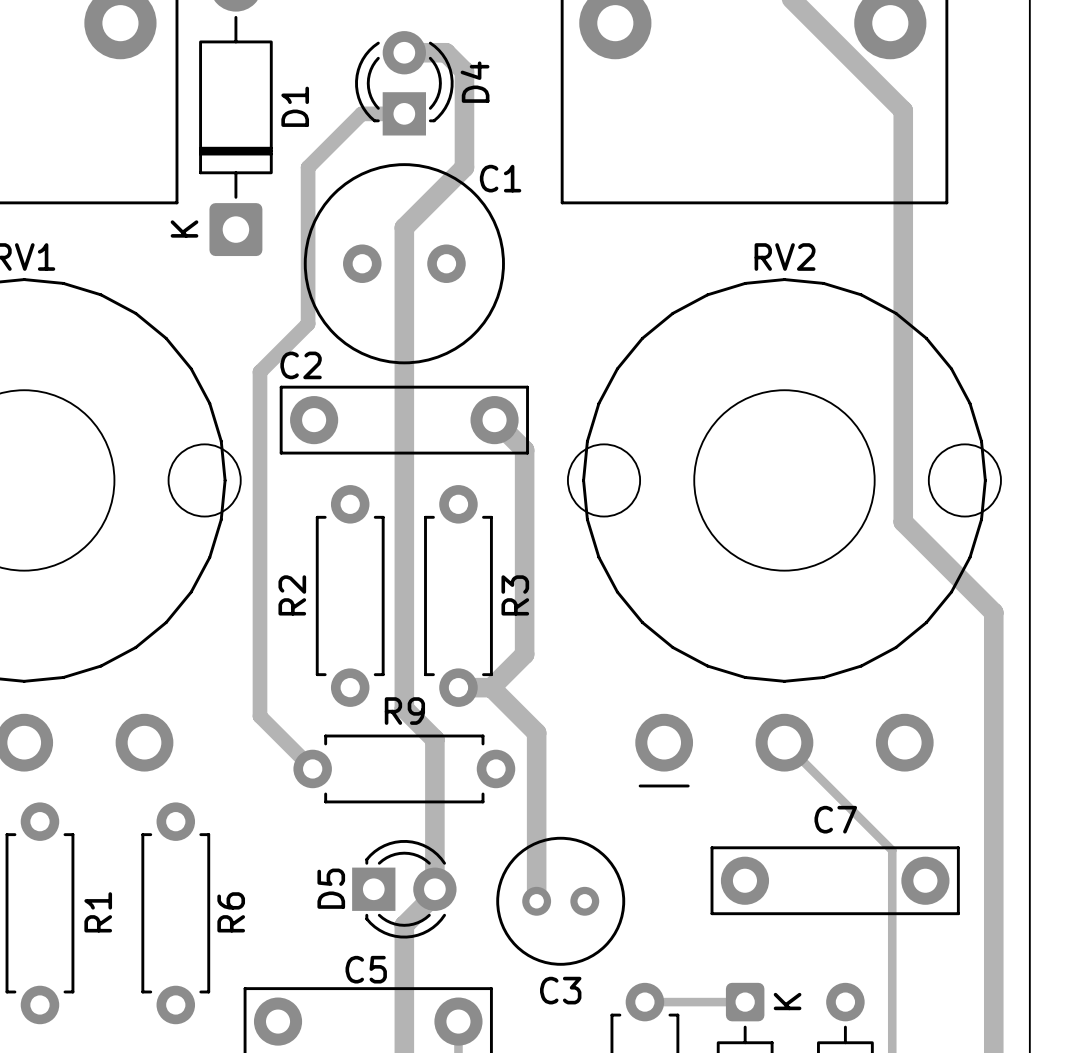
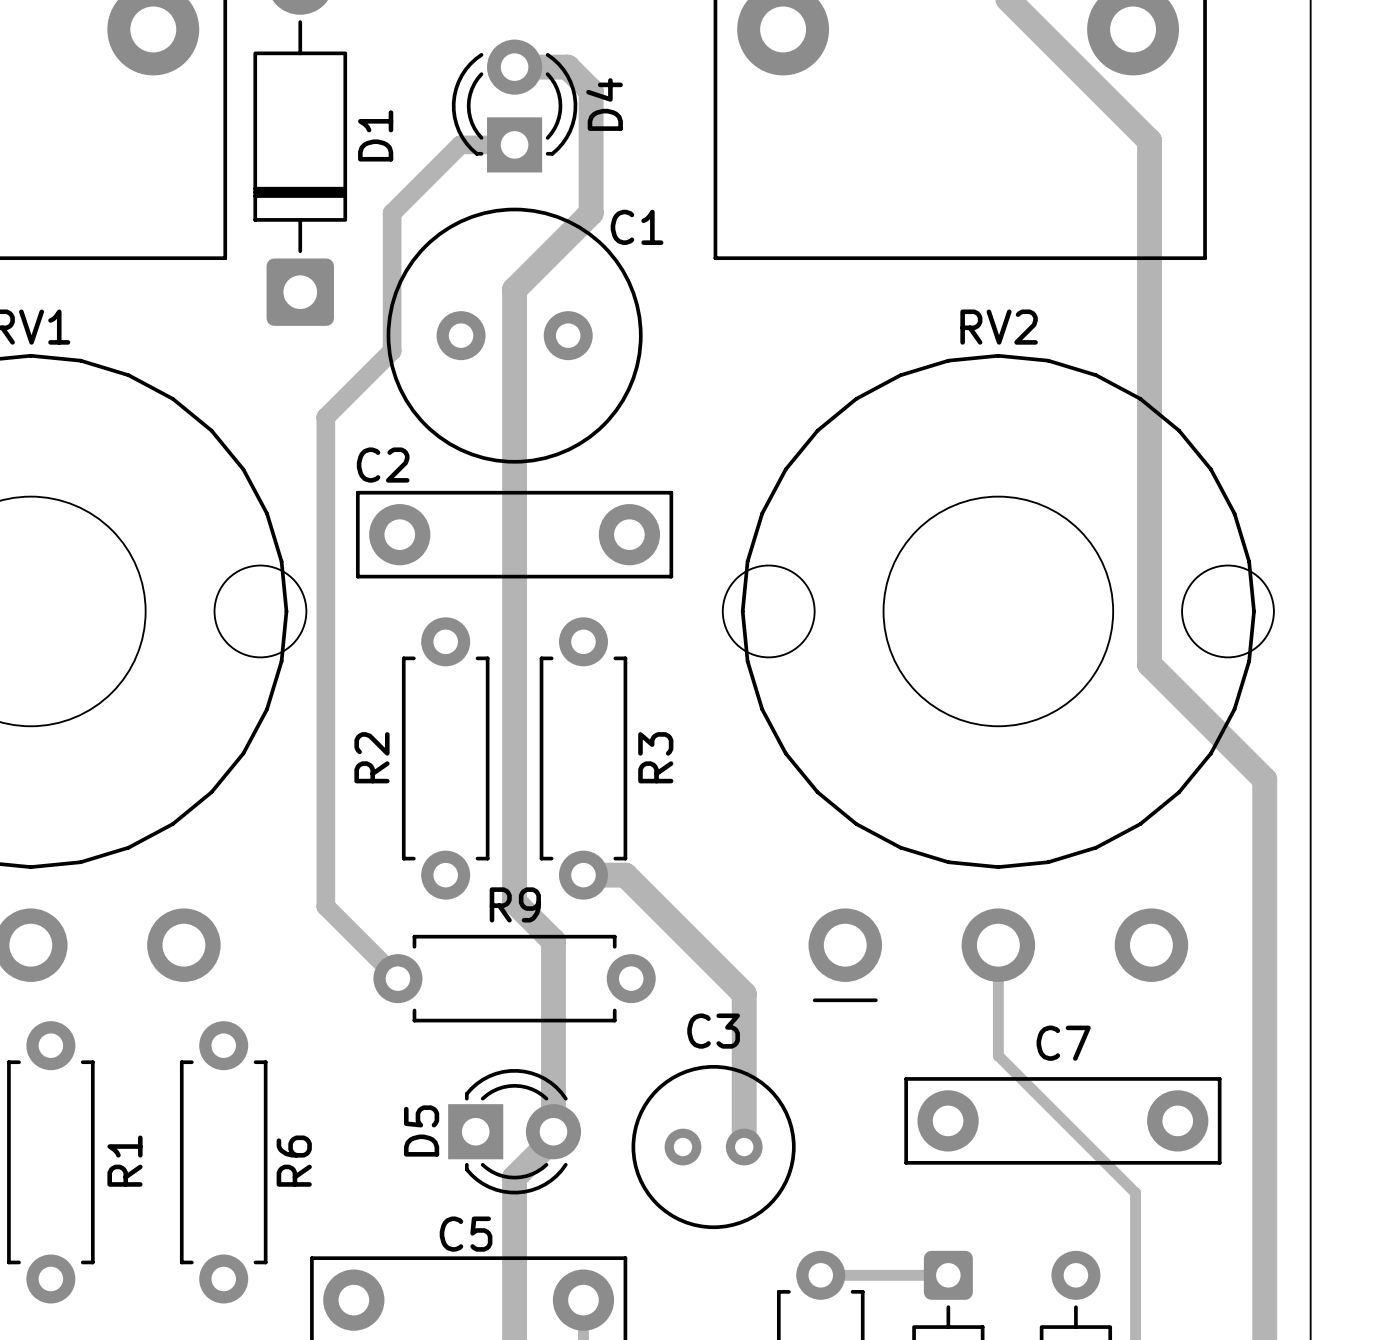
D1 text: K (184, 229) -> none
track: (308, 275) (308, 323) (259, 372) (259, 716) -> (392, 350) (325, 417) (325, 906) (330, 911)
track: (494, 420) (524, 450) (524, 654) (491, 687) -> none
track: (536, 732) (536, 901) -> (682, 932) (744, 993) (744, 1147)
track: (784, 742) (892, 850) (892, 937) -> (998, 945) (998, 1055) (1135, 1192)
C3 name position: C3 (560, 990) -> C3 (713, 1031)
part text: K (787, 1001) -> none

